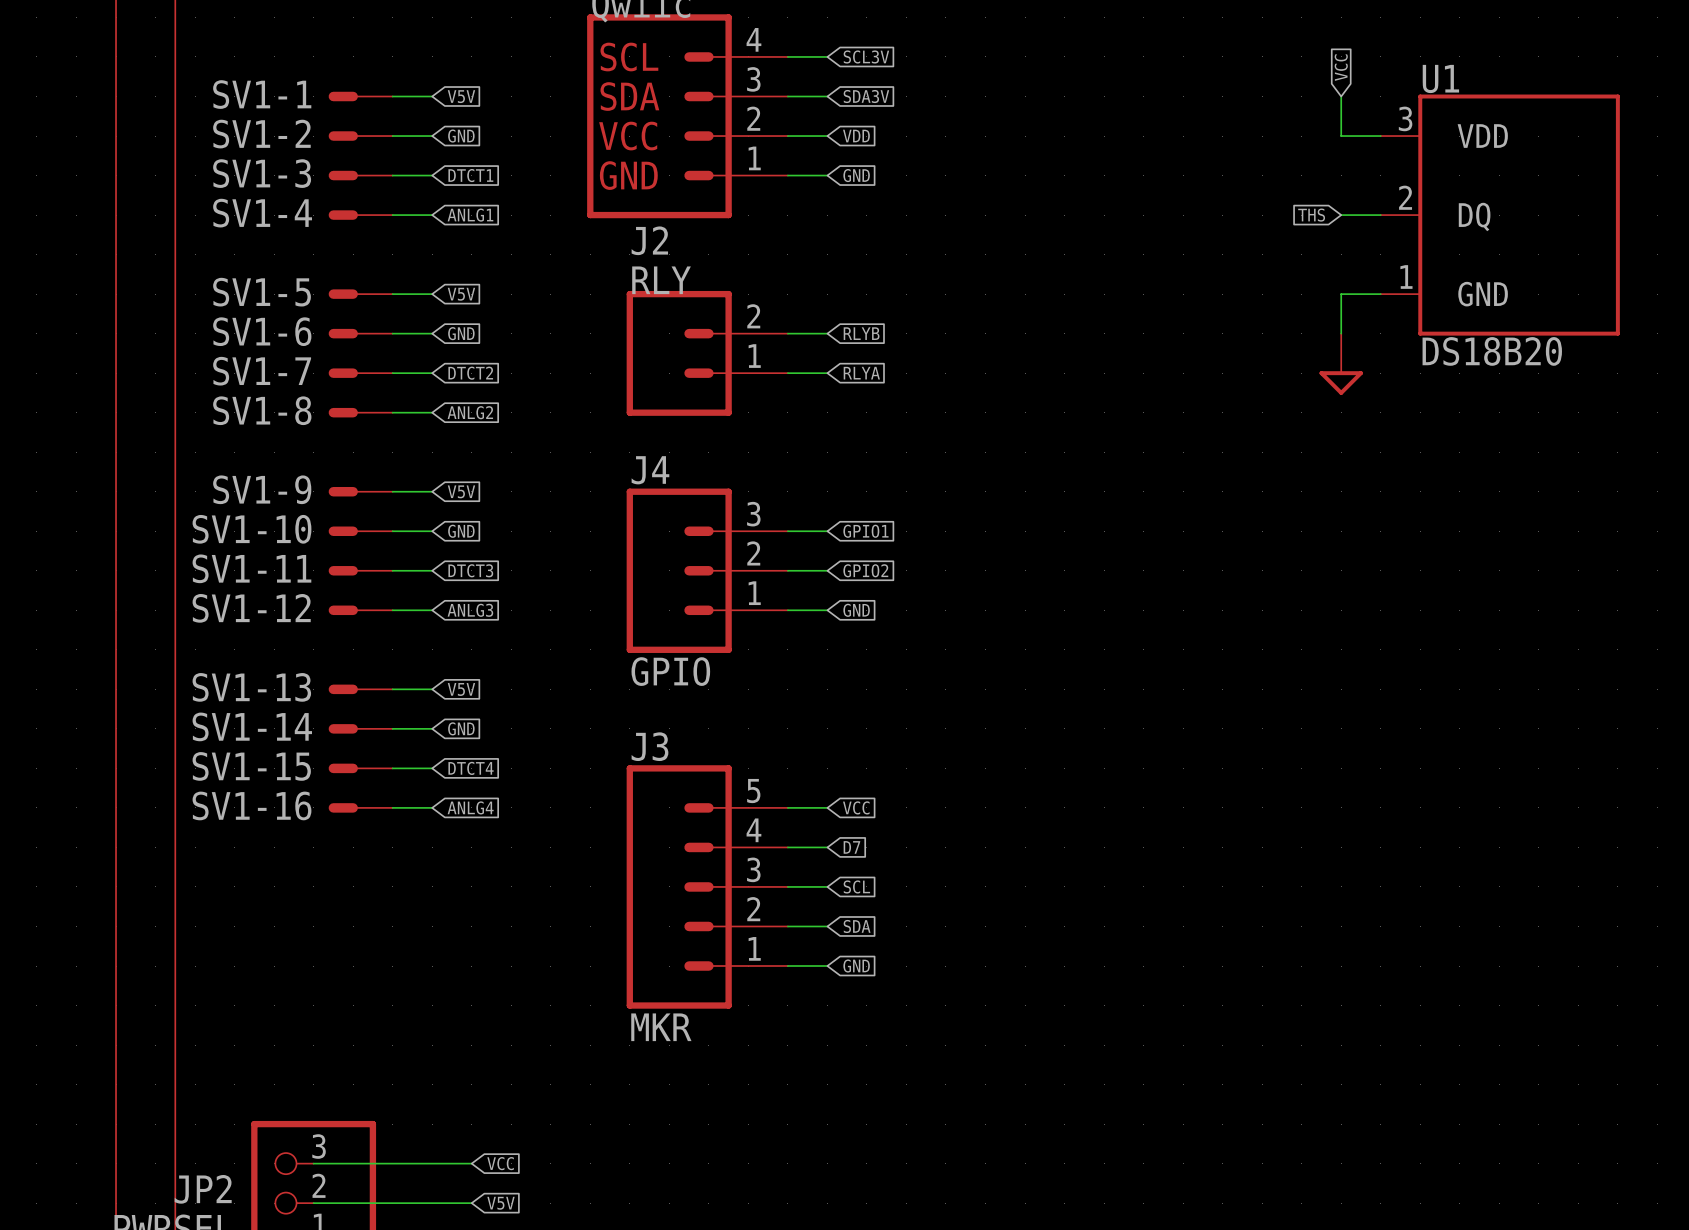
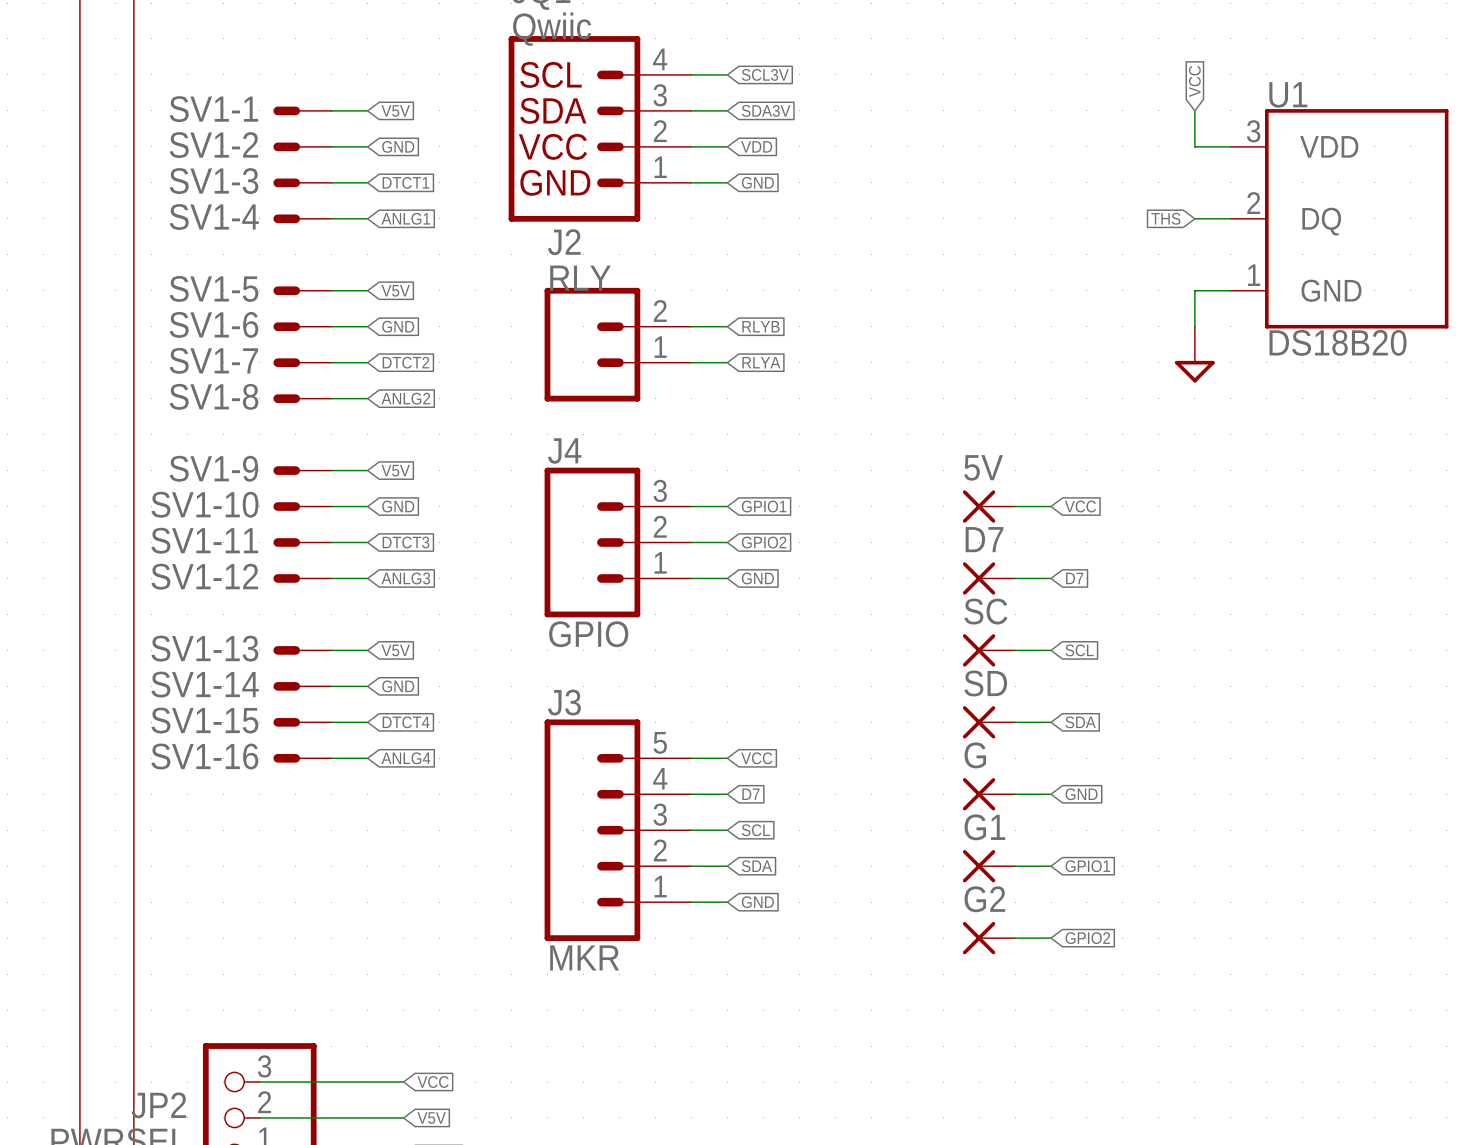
5V: none -> (988, 506)
wire: none -> (1015, 506) (1051, 506)
global label: none -> VCC (1080, 506)
D7: none -> (988, 578)
wire: none -> (1015, 578) (1051, 578)
global label: none -> D7 (1074, 578)
SC: none -> (988, 650)
wire: none -> (1015, 650) (1051, 650)
global label: none -> SCL (1079, 650)
SD: none -> (988, 722)
wire: none -> (1015, 722) (1051, 722)
global label: none -> SDA (1080, 722)
G: none -> (988, 794)
wire: none -> (1015, 794) (1051, 794)
global label: none -> GND (1081, 794)
G1: none -> (988, 866)
wire: none -> (1015, 866) (1051, 866)
global label: none -> GPIO1 (1087, 866)
G2: none -> (988, 938)
wire: none -> (1015, 938) (1051, 938)
global label: none -> GPIO2 (1087, 938)

